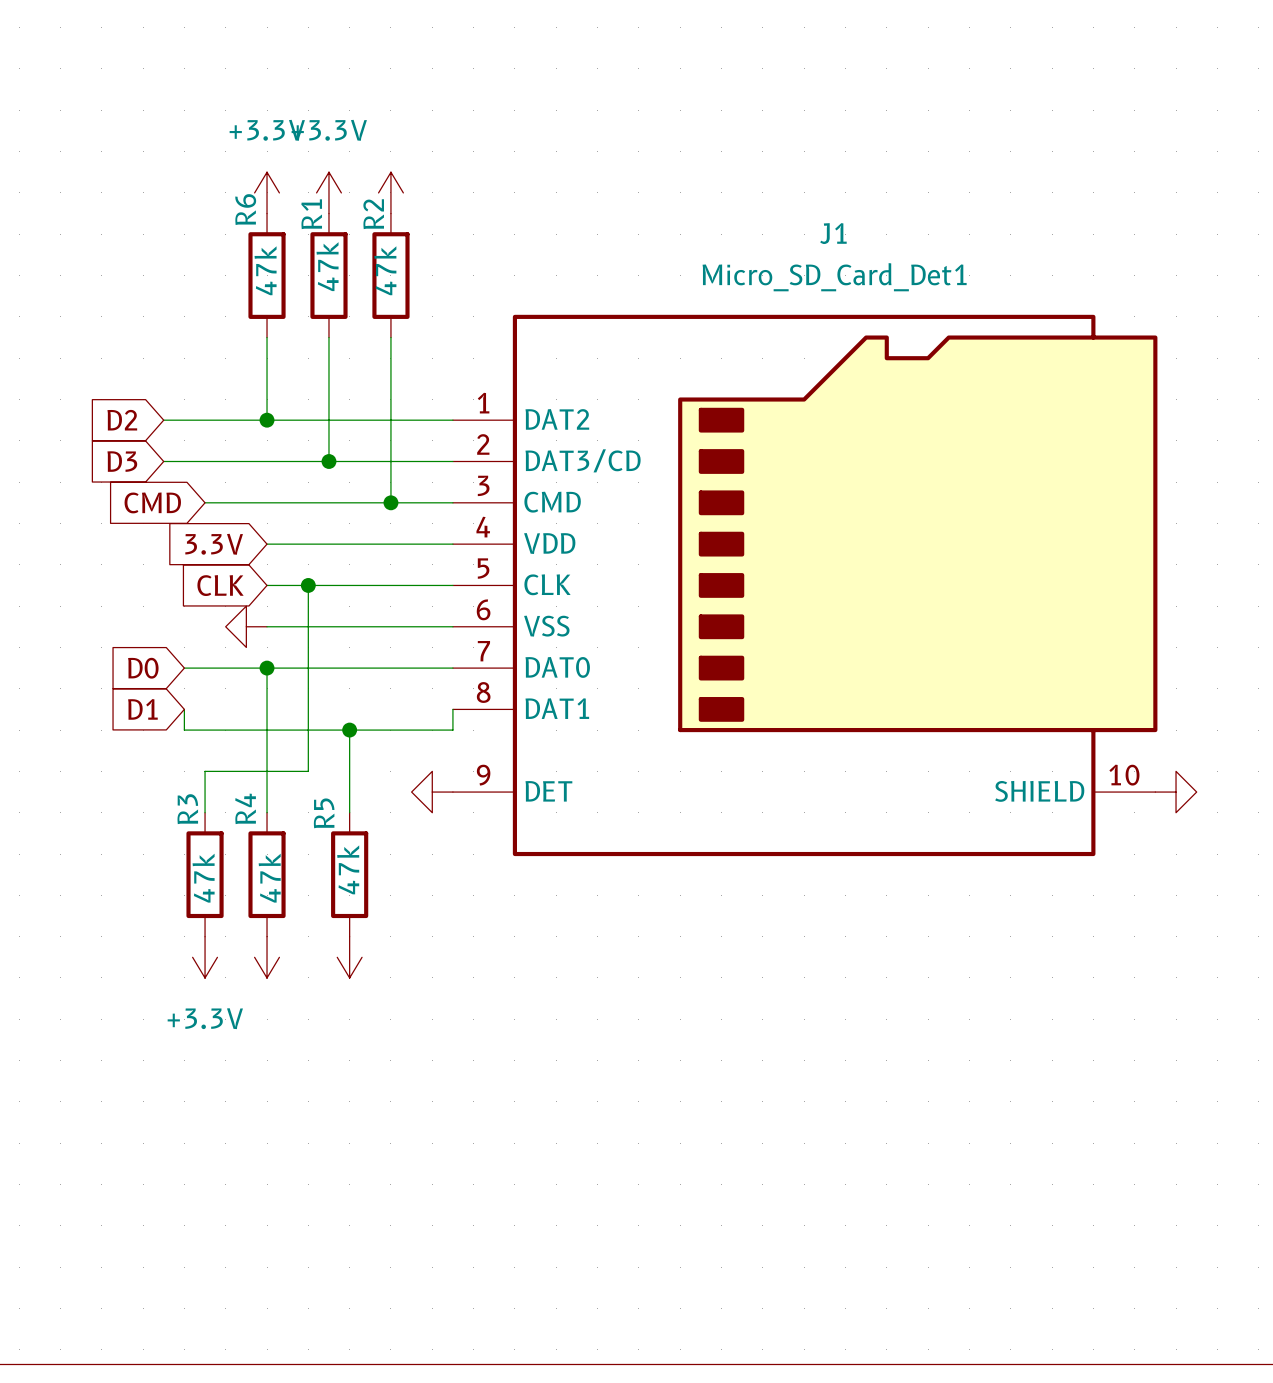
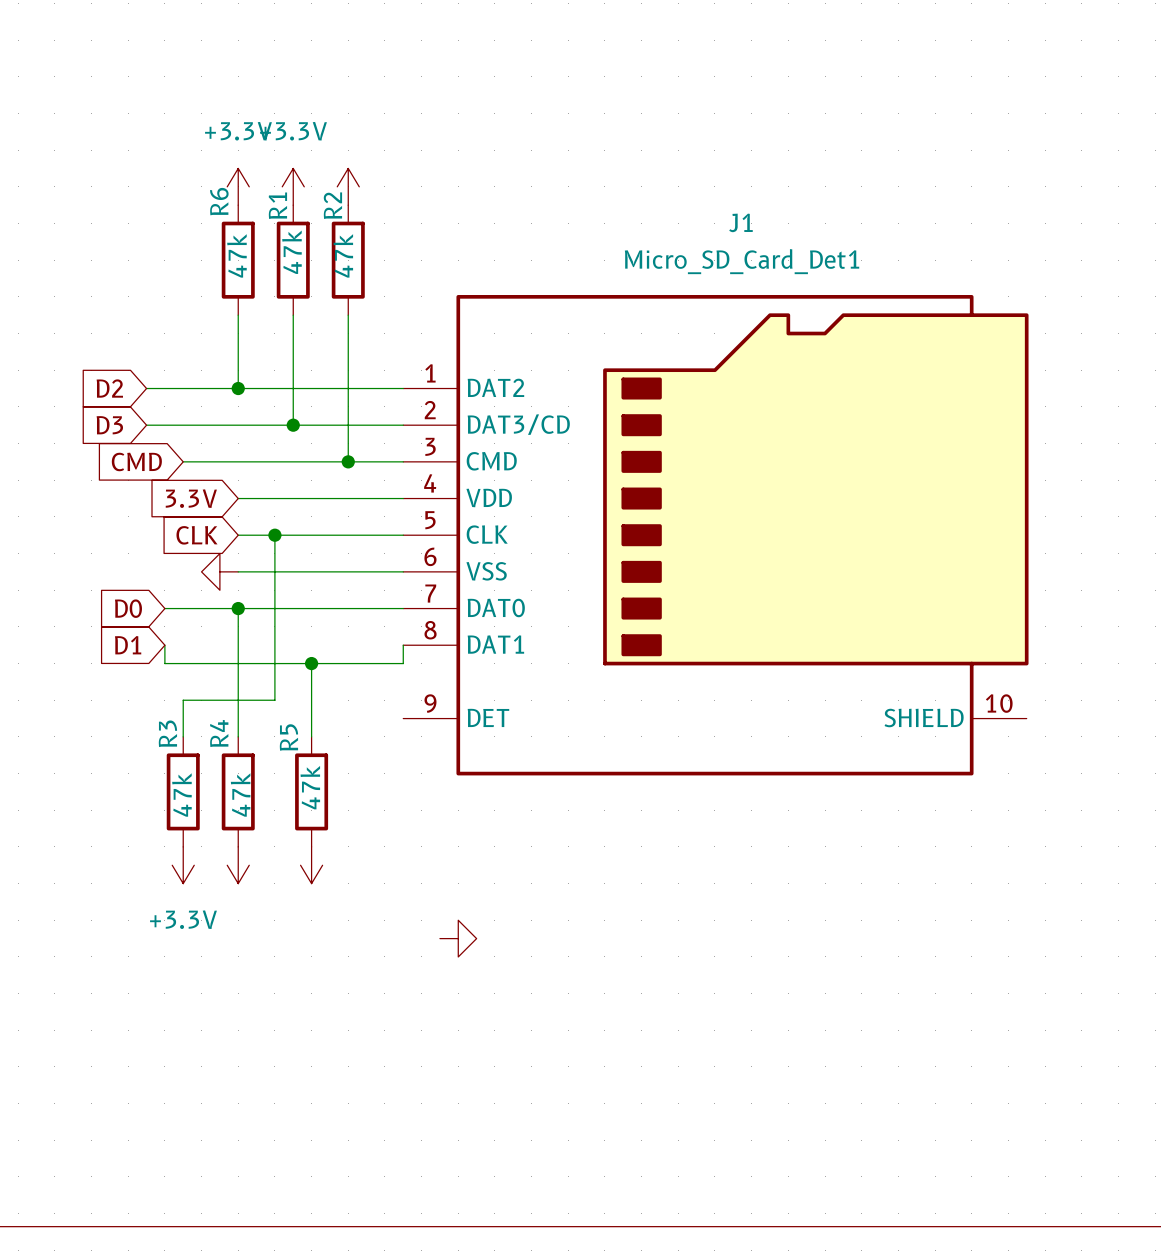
power symbol rotation: 0° (432, 792) -> 180° (458, 938)
power symbol position: (432, 792) -> (458, 938)
power symbol: (1176, 792) -> none

